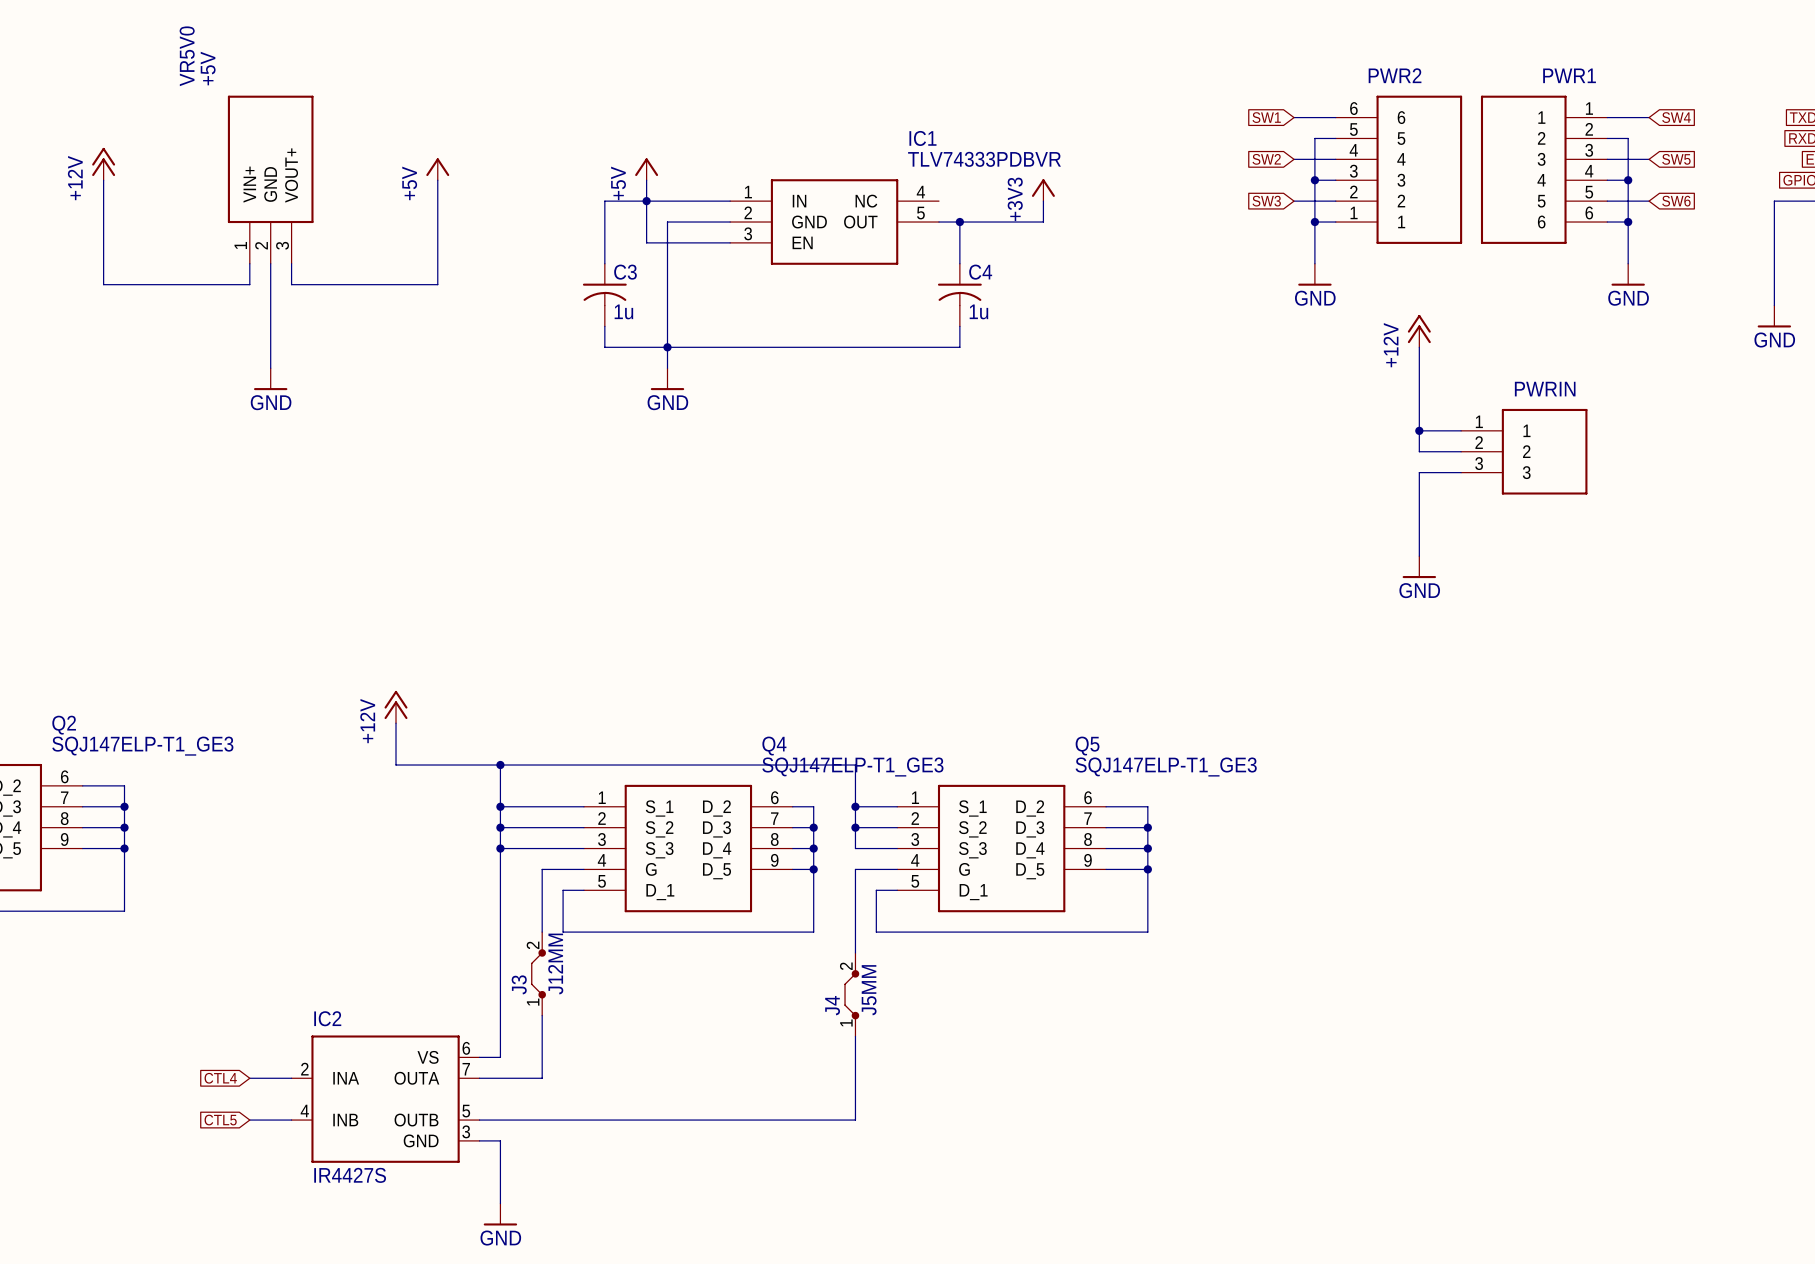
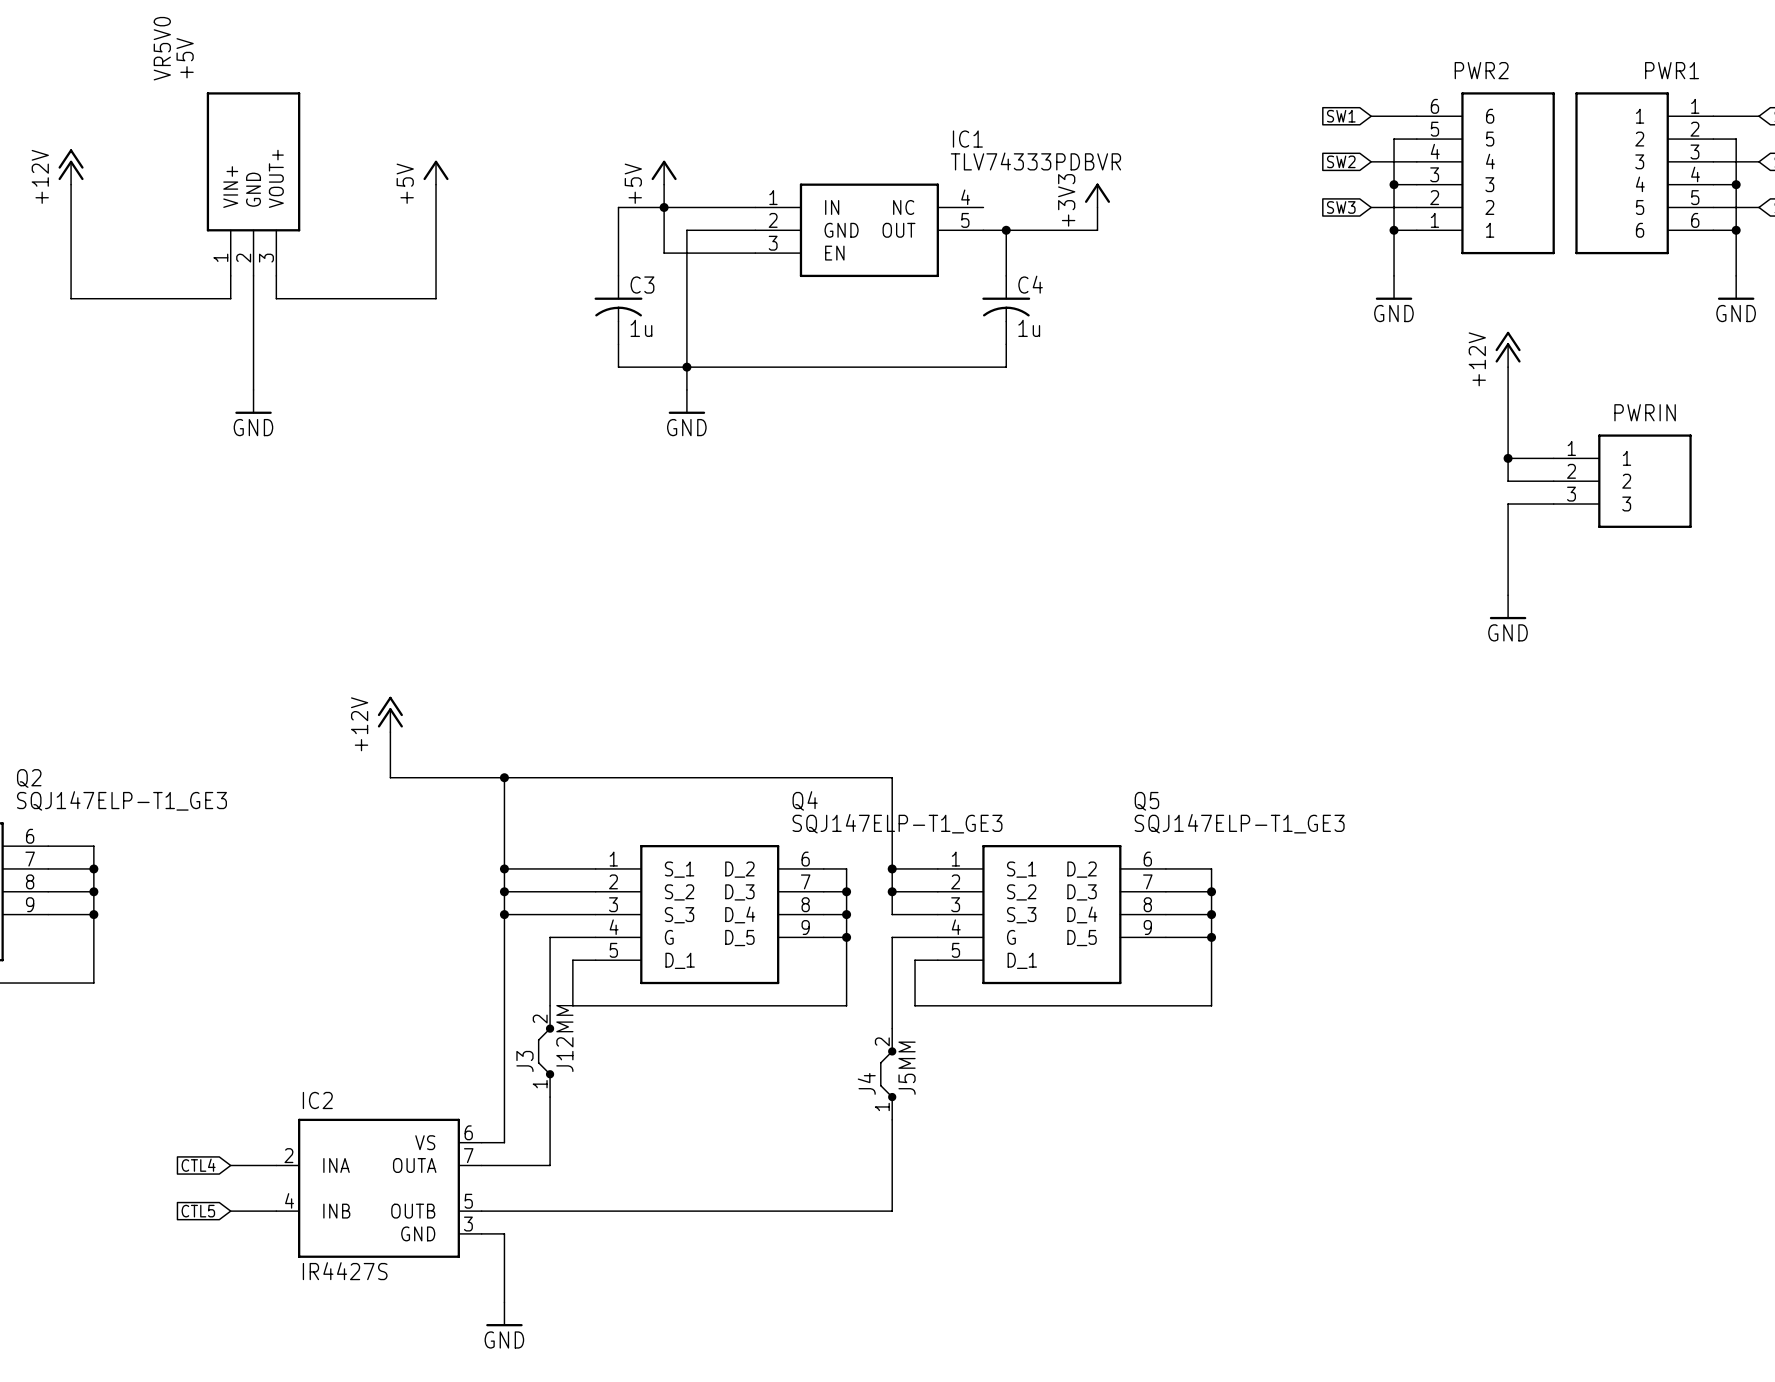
power symbol position: +12V (396, 707) -> +12V (390, 714)
wire: (396, 723) (396, 765) (855, 765) -> (390, 732) (390, 777) (892, 777) (892, 823)
wire: none -> (504, 777) (504, 823)
junction position: (500, 765) -> (504, 777)

